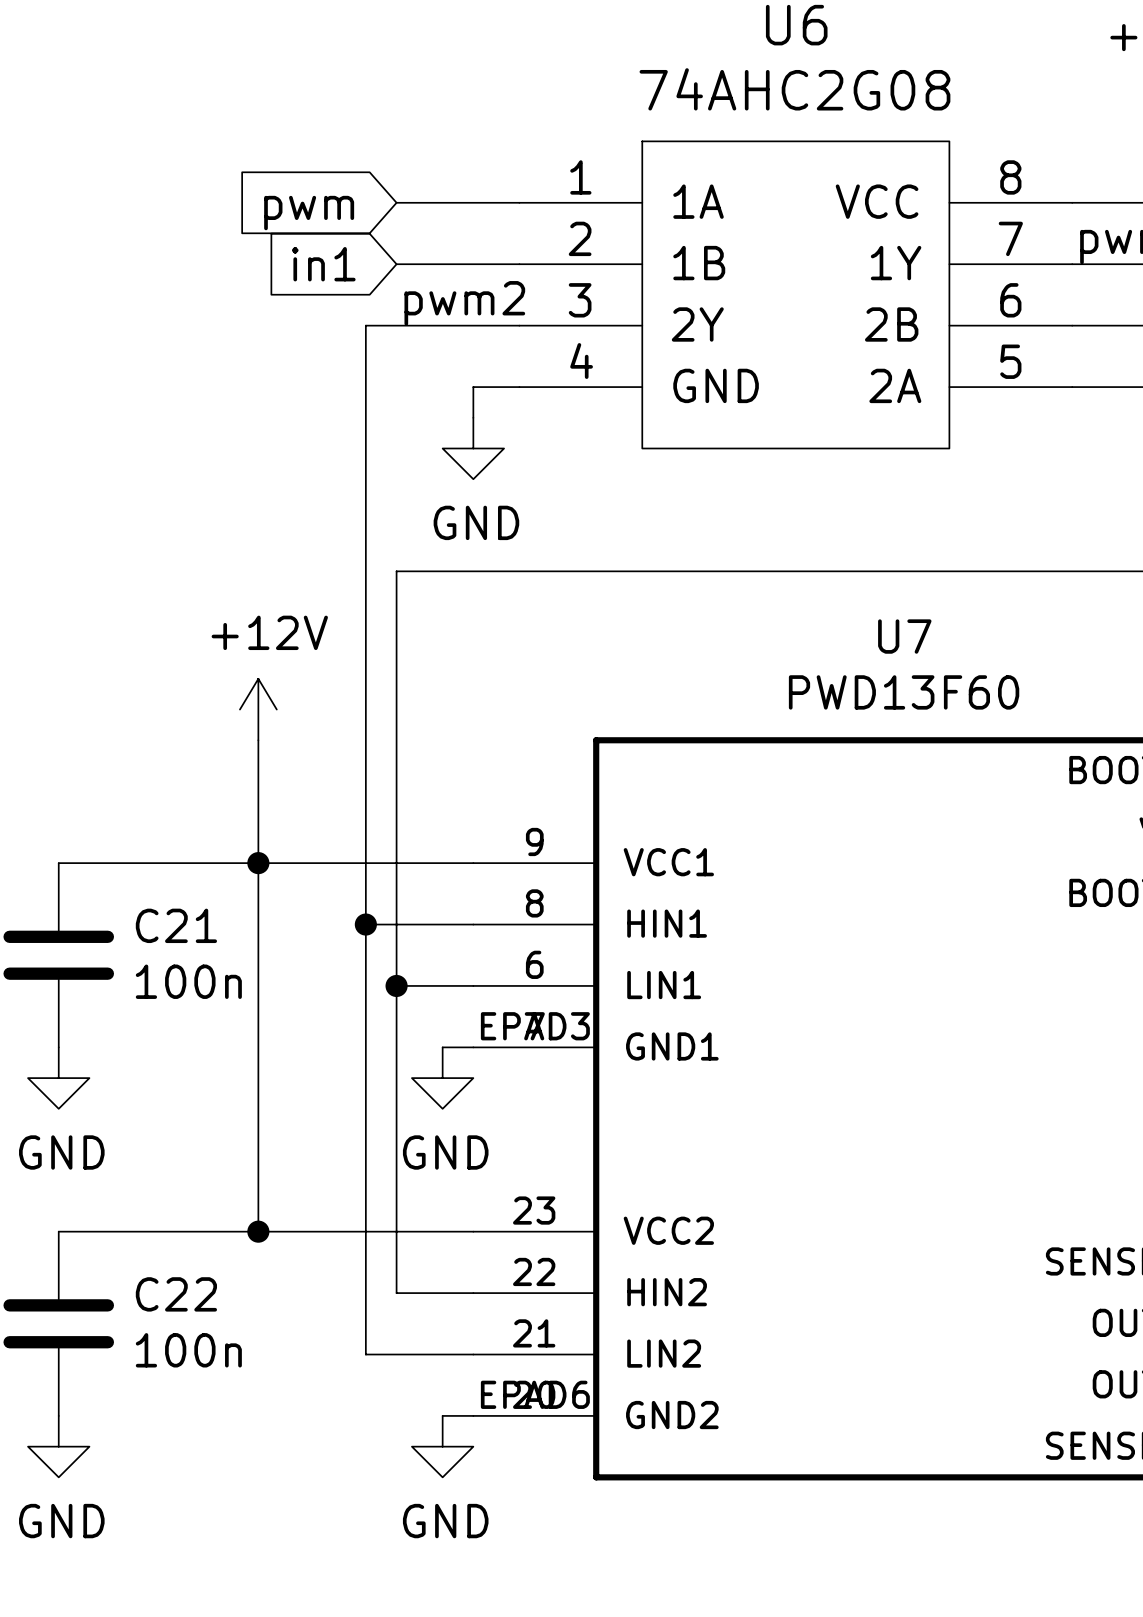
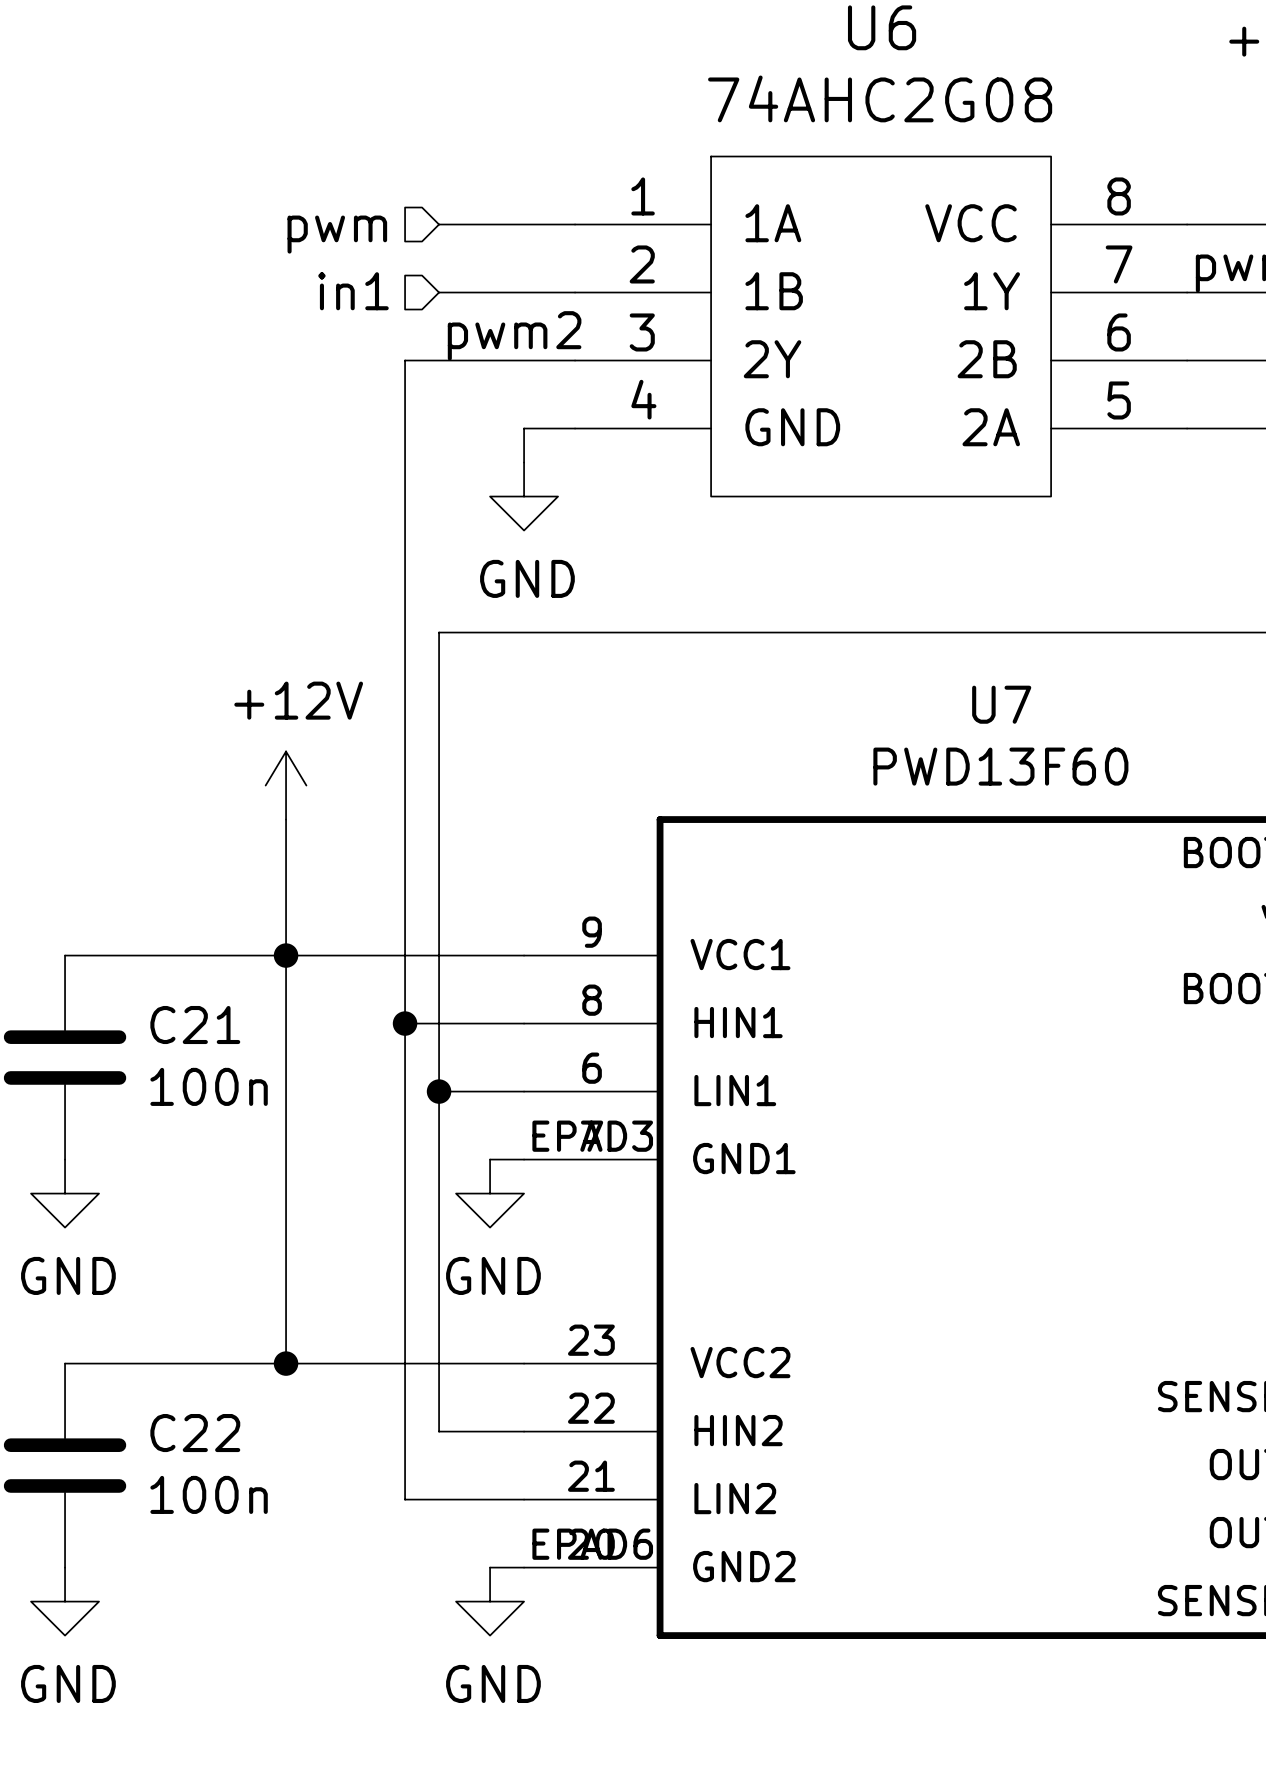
hierarchical label: none -> pwm (337, 234)
global label: pwm (309, 213) -> none
hierarchical label: none -> in1 (353, 291)
global label: in1 (323, 264) -> none

